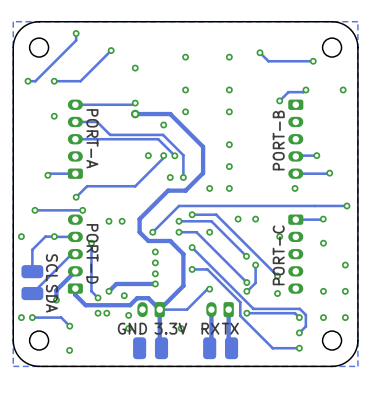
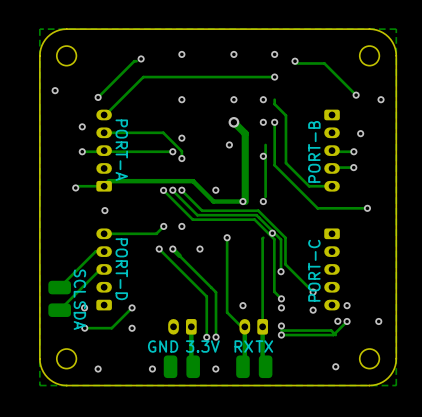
track: (76, 33) (76, 40) (35, 81) (28, 81) -> none
via: (76, 33) -> none
via: none -> (181, 54)
via: none -> (233, 54)
via: none -> (274, 54)
track: (111, 50) (80, 81) (54, 81) -> none
track: none -> (136, 61) (134, 61) (98, 97)
track: (260, 52) (268, 61) (313, 61) -> none
track: none -> (295, 63) (324, 63) (356, 95)
via: (185, 57) -> none
via: (229, 57) -> none
via: (313, 61) -> none
via: (135, 68) -> none
via: none -> (274, 77)
via position: (54, 81) -> (98, 97)
via: none -> (356, 95)
via: none -> (181, 99)
via: (185, 89) -> none
via: none -> (233, 99)
track: (305, 89) (303, 92) (288, 92) (279, 100) -> none
via: (305, 89) -> none
via: (279, 100) -> none
track: (135, 103) (133, 104) (76, 104) -> (274, 77) (143, 77) (105, 114)
via: (135, 103) -> none
via: (185, 111) -> none
track: none -> (233, 122) (245, 133) (245, 201) (213, 201) (193, 181) (109, 181) (104, 186)
via: none -> (233, 122)
track: none -> (274, 122) (274, 165) (317, 208) (367, 208)
via: none -> (274, 122)
track: (135, 114) (170, 114) (203, 146) (203, 173) (185, 190) (168, 190) (139, 219) (139, 232) (141, 234) -> none
via: (135, 114) -> none
track: (97, 121) (110, 134) (163, 134) (183, 155) (183, 177) -> (126, 132) (163, 132) (181, 151) (181, 158)
via: none -> (360, 133)
via: (163, 124) -> none
via: none -> (181, 138)
via: none -> (229, 144)
track: none -> (265, 144) (265, 197)
track: (75, 139) (158, 139) (174, 155) -> none
track: none -> (332, 150) (353, 151)
via: none -> (82, 151)
track: none -> (172, 151) (82, 151)
via: none -> (172, 151)
via: none -> (353, 151)
via: none -> (181, 158)
via: (148, 155) -> none
track: (163, 155) (135, 186) (87, 186) (76, 197) -> none
via: (163, 155) -> none
via: (174, 155) -> none
via: (229, 166) -> none
track: (329, 173) (295, 173) -> (274, 99) (274, 104) (285, 115) (285, 163) (309, 186) (332, 186)
via: (329, 173) -> none
via: none -> (163, 190)
via: none -> (172, 190)
via: none -> (181, 190)
via: (170, 177) -> none
via: (295, 188) -> none
via: none -> (367, 208)
track: (179, 205) (152, 232) -> (211, 219) (192, 219) (163, 190)
track: (346, 205) (220, 205) -> none
via: (346, 205) -> none
via: (34, 210) -> none
track: (82, 210) (34, 210) -> none
via: (82, 210) -> none
track: none -> (163, 226) (156, 233) (104, 233)
via: none -> (163, 226)
via: none -> (181, 226)
track: (192, 214) (216, 214) (250, 249) -> (181, 190) (202, 210) (258, 210) (285, 237) (285, 264)
via: (192, 214) -> none
via: (255, 219) -> none
track: (323, 219) (295, 219) -> none
via: (323, 219) -> none
via: (108, 221) -> none
via: (122, 221) -> none
track: (179, 221) (211, 221) (246, 256) -> (172, 190) (197, 215) (256, 215) (281, 239) (281, 271)
via: (179, 221) -> none
track: none -> (227, 237) (227, 312) (241, 326) (244, 326)
via: none -> (227, 237)
track: none -> (263, 237) (262, 326)
via: (152, 232) -> none
track: (179, 232) (196, 232) (240, 275) -> (254, 219) (274, 239) (274, 291)
via: (179, 232) -> none
via: (209, 232) -> none
track: none -> (159, 249) (206, 296) (206, 337)
via: none -> (159, 249)
via: none -> (172, 249)
via: none -> (199, 249)
via: (21, 236) -> none
via: (54, 236) -> none
track: (67, 236) (45, 236) (32, 249) (32, 271) -> (95, 251) (59, 287)
via: (279, 236) -> none
track: (148, 240) (170, 240) (183, 254) (183, 285) (159, 309) -> (179, 255) (216, 292) (216, 337)
track: (91, 243) (91, 291) (98, 297) -> none
via: (91, 243) -> none
via: (323, 243) -> none
track: (192, 247) (253, 308) (299, 308) (305, 314) (305, 326) (299, 332) -> none
via: (192, 247) -> none
via: (155, 251) -> none
via: (155, 262) -> none
track: (255, 265) (255, 282) (246, 291) -> none
via: (255, 265) -> none
via: (345, 265) -> none
track: (192, 269) (207, 269) (240, 302) (240, 315) (272, 348) (299, 348) -> none
via: (192, 269) -> none
track: (75, 271) (56, 290) (56, 300) -> none
via: (155, 273) -> none
track: (155, 283) (116, 283) (108, 291) -> none
via: (155, 283) -> none
track: (75, 288) (75, 294) (85, 305) (130, 305) (137, 298) (148, 298) (159, 309) -> none
track: (209, 289) (187, 309) (159, 309) -> none
via: none -> (347, 305)
via: none -> (84, 307)
track: none -> (132, 307) (111, 328) (84, 328)
via: none -> (132, 307)
via: (108, 291) -> none
via: (323, 291) -> none
via: (345, 291) -> none
via: (124, 295) -> none
via: (98, 297) -> none
via: (56, 300) -> none
via: none -> (337, 321)
track: none -> (347, 321) (333, 335) (281, 335)
via: none -> (347, 321)
via: none -> (378, 321)
via: none -> (281, 326)
via: none -> (84, 328)
via: none -> (132, 328)
via: (98, 313) -> none
via: (106, 313) -> none
via: (246, 313) -> none
via: (128, 315) -> none
via: (21, 317) -> none
track: (32, 317) (61, 317) (69, 326) -> none
via: (32, 317) -> none
via: none -> (281, 335)
via: (299, 317) -> none
via: (323, 317) -> none
via: (345, 317) -> none
via: none -> (206, 337)
via: none -> (216, 337)
via: (69, 326) -> none
via: (128, 328) -> none
via: (181, 328) -> none
via: (299, 332) -> none
via: none -> (152, 369)
via: none -> (215, 369)

